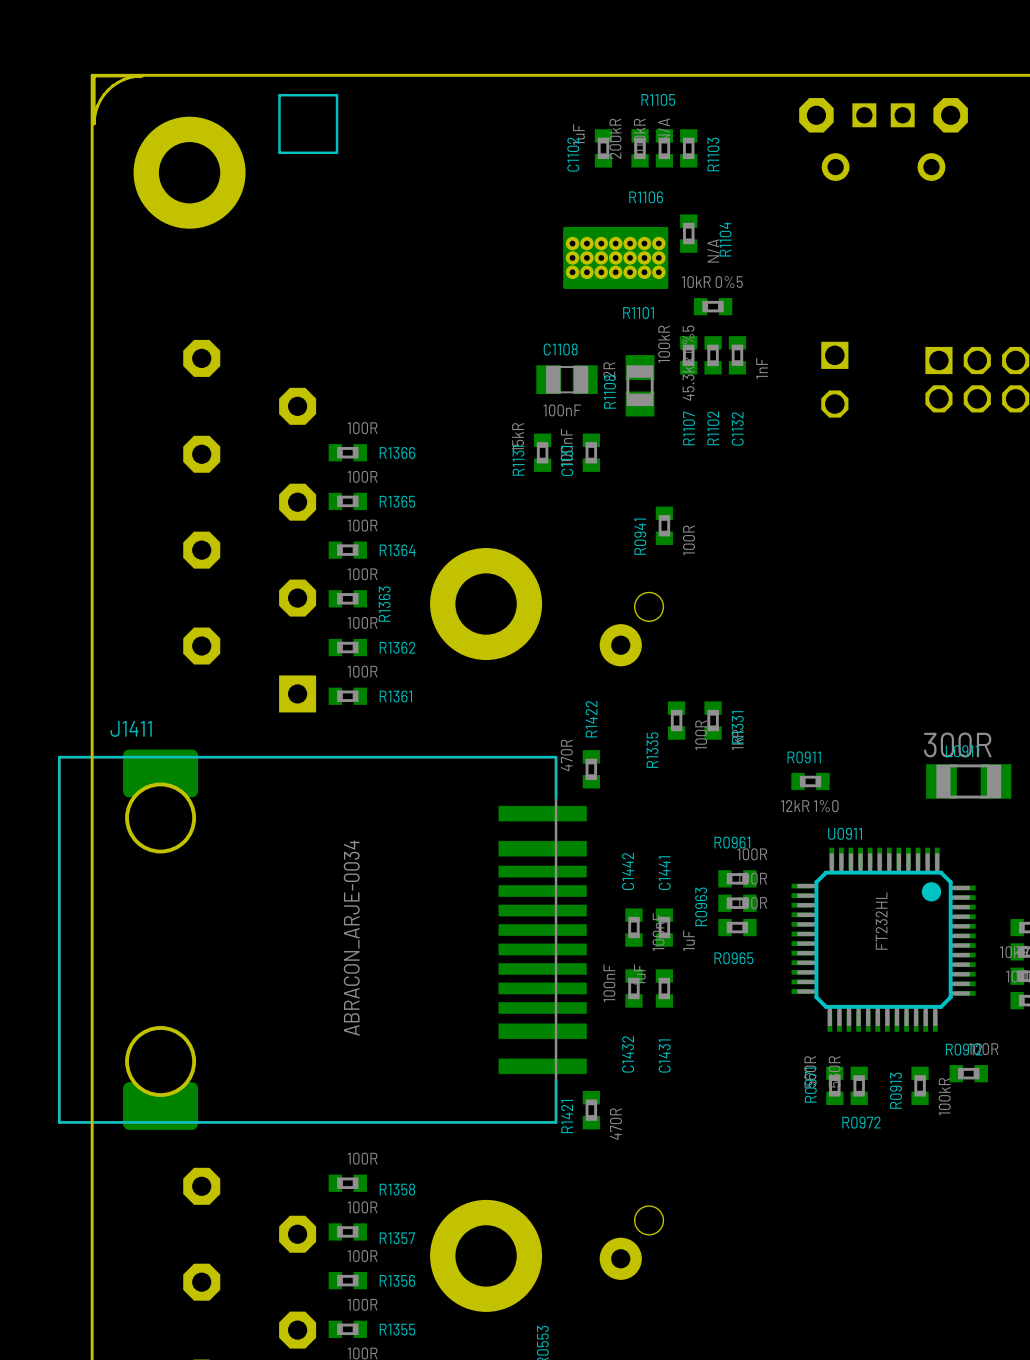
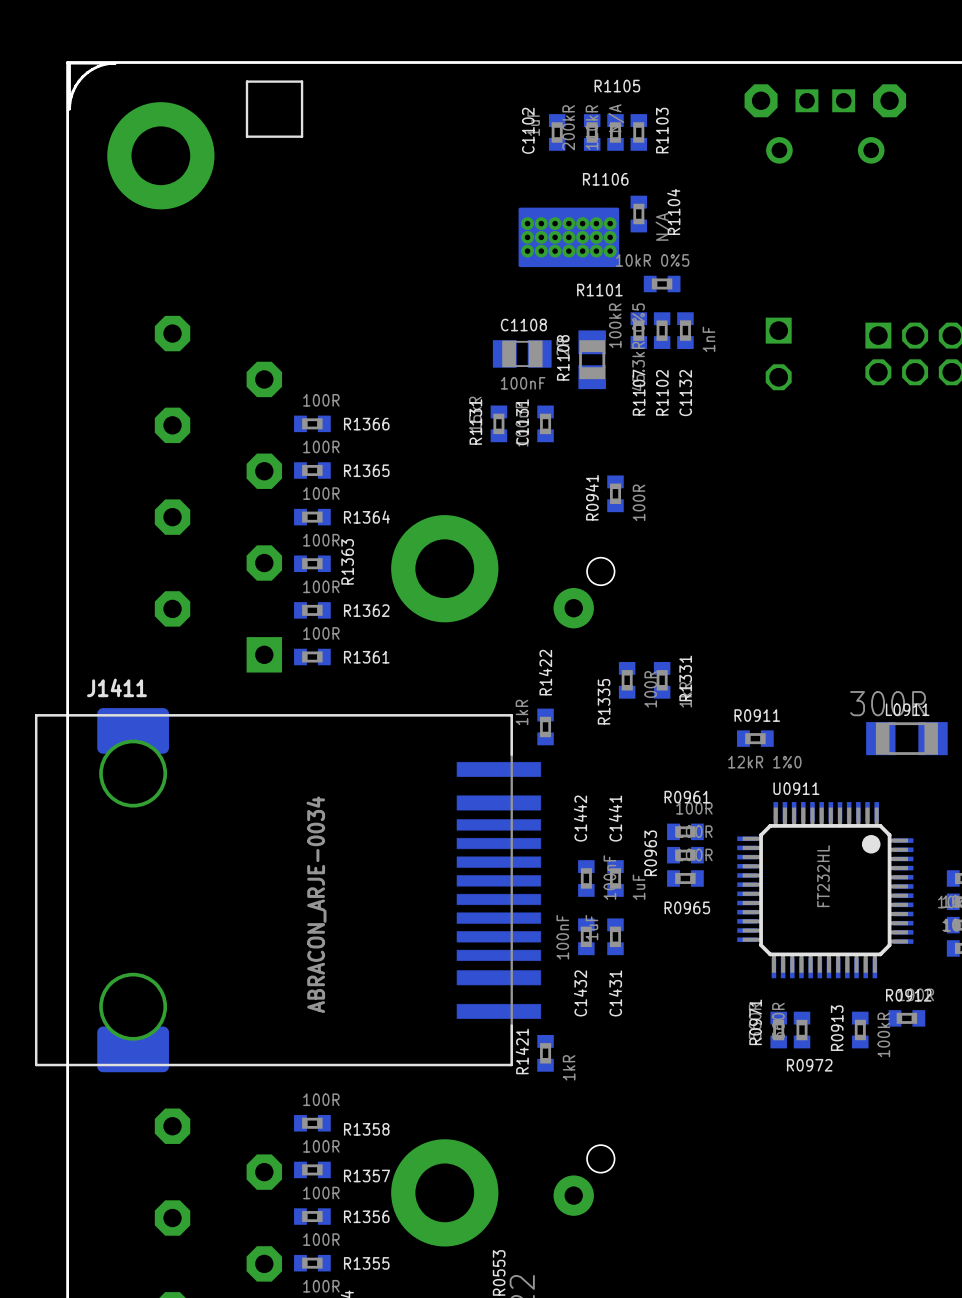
R1422 value: 470R (566, 755) -> 1kR (522, 712)
R1421 value: 470R (615, 1124) -> 1kR (569, 1067)

